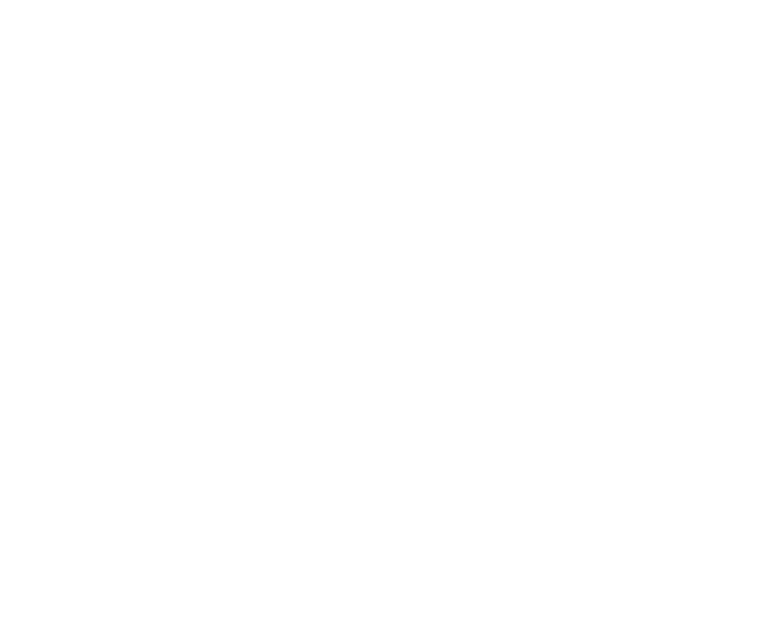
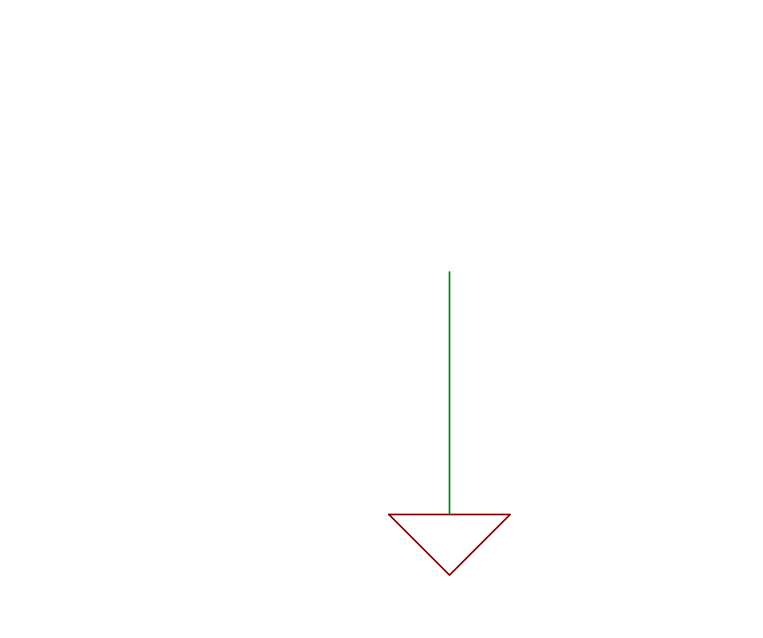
wire: none -> (449, 271) (449, 514)
power symbol: none -> (449, 544)

